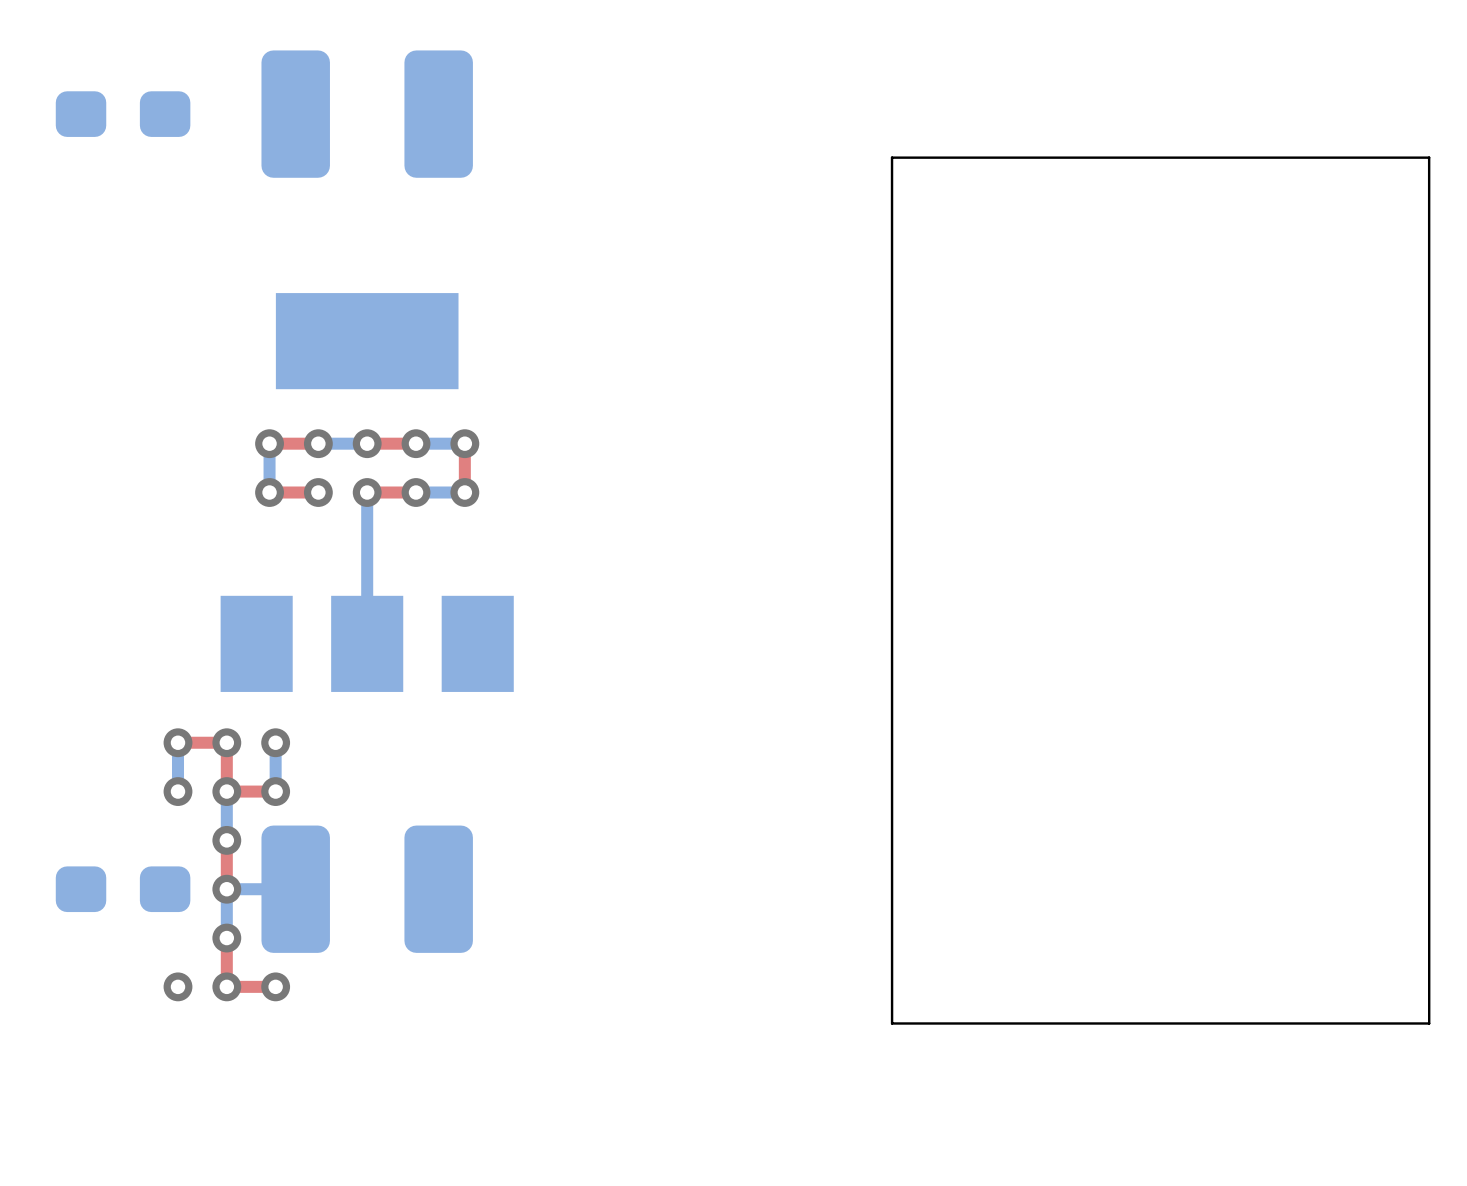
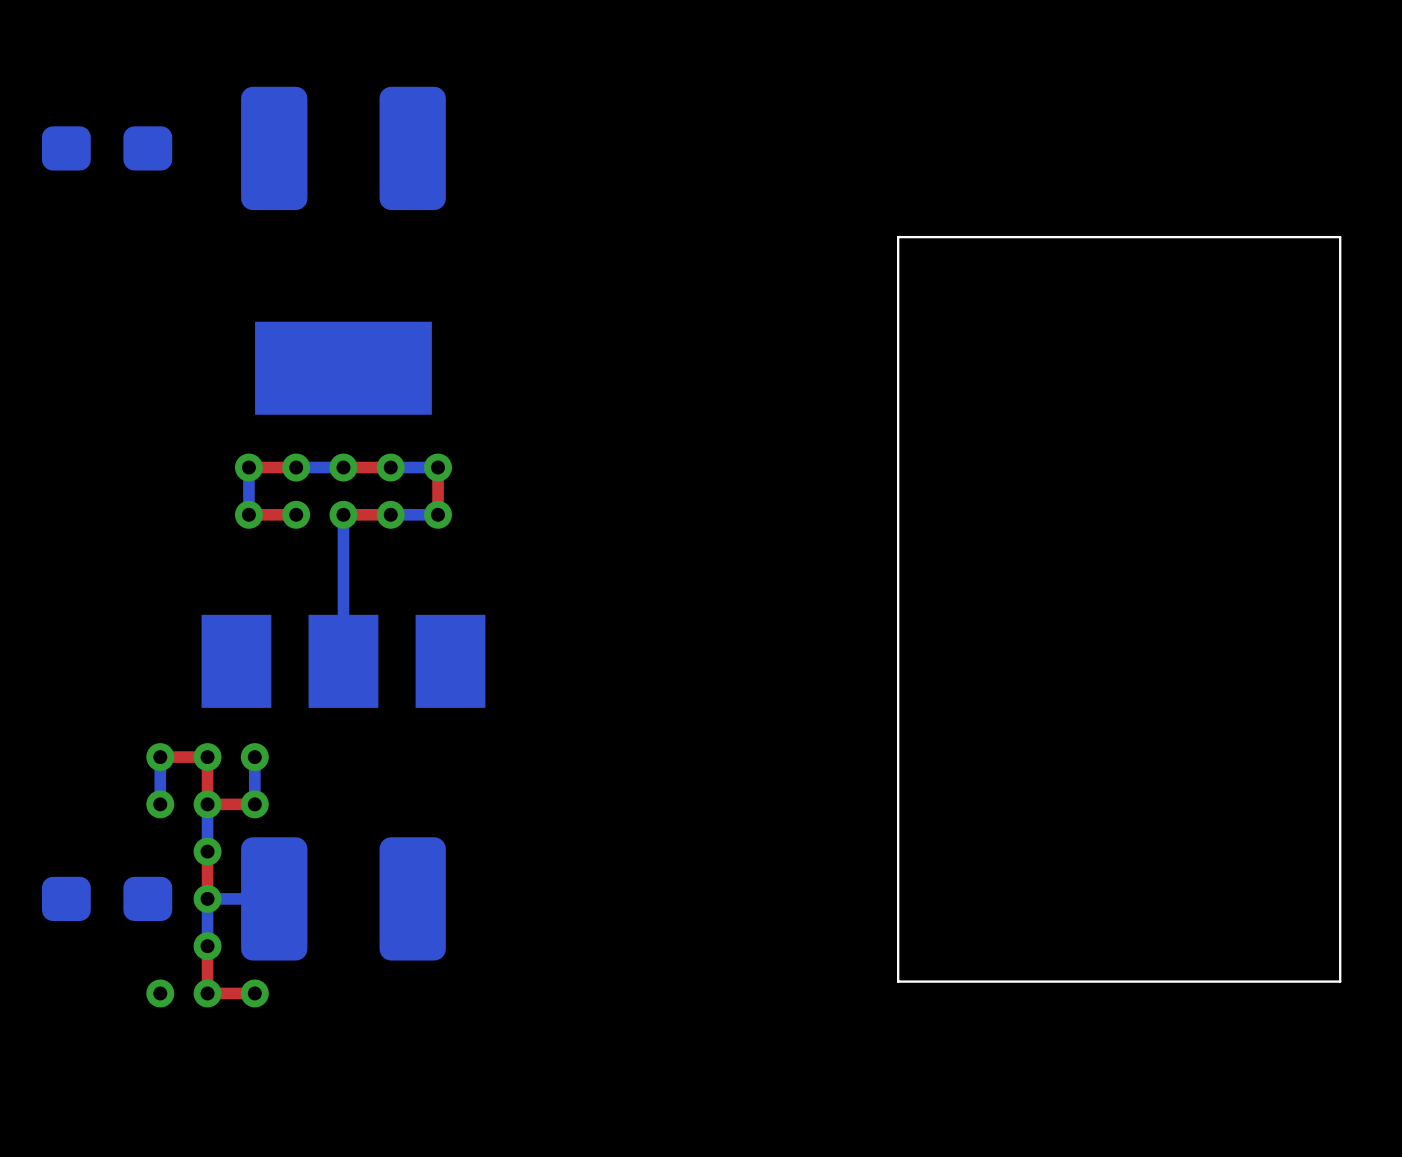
board edge: (892, 157) (1429, 157) (1429, 1023) (892, 1023) (892, 157) -> (898, 237) (898, 981) (1340, 981) (1340, 237) (898, 237)

